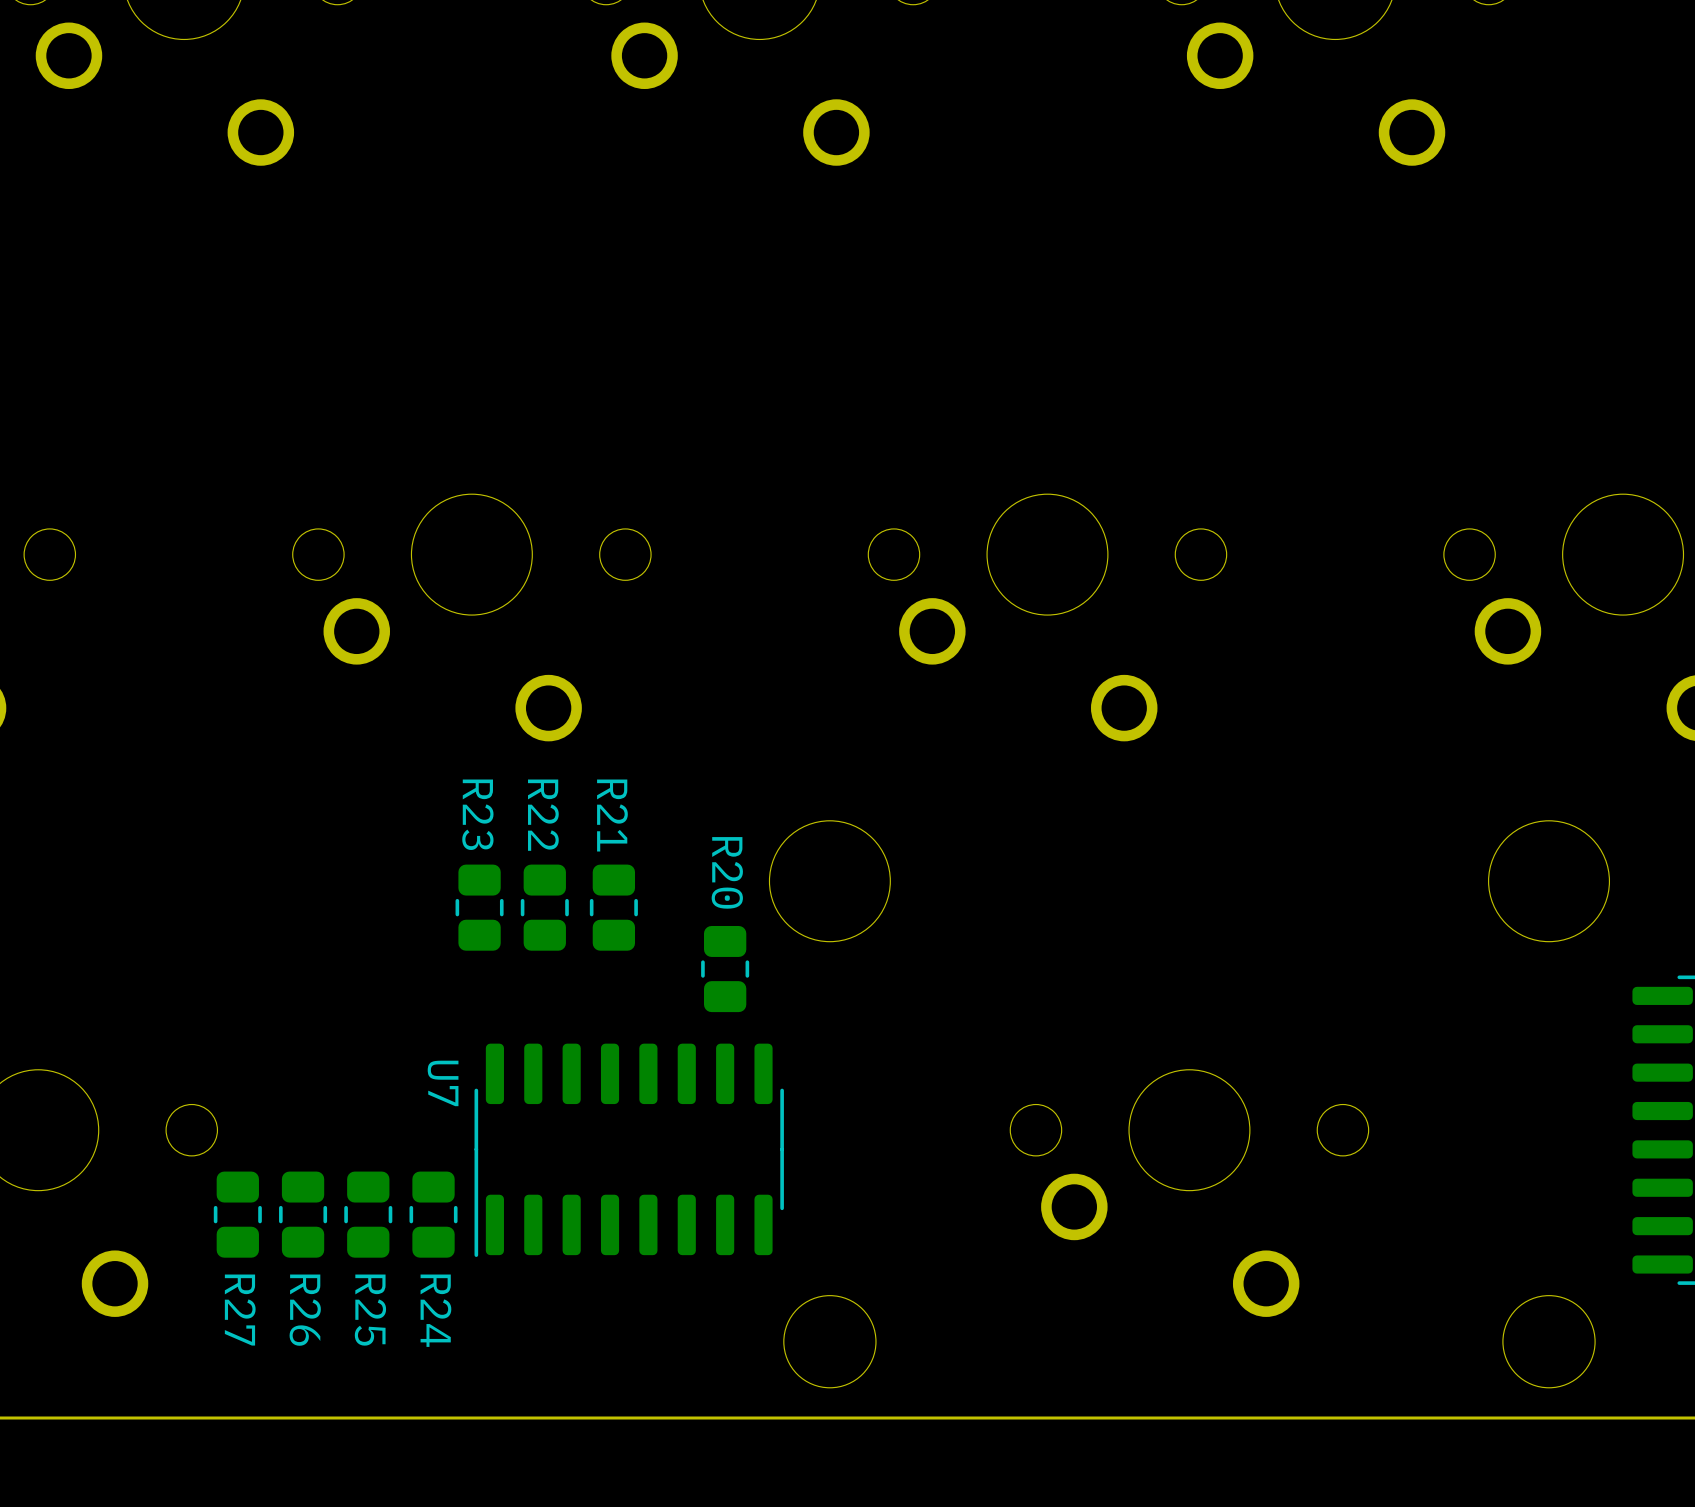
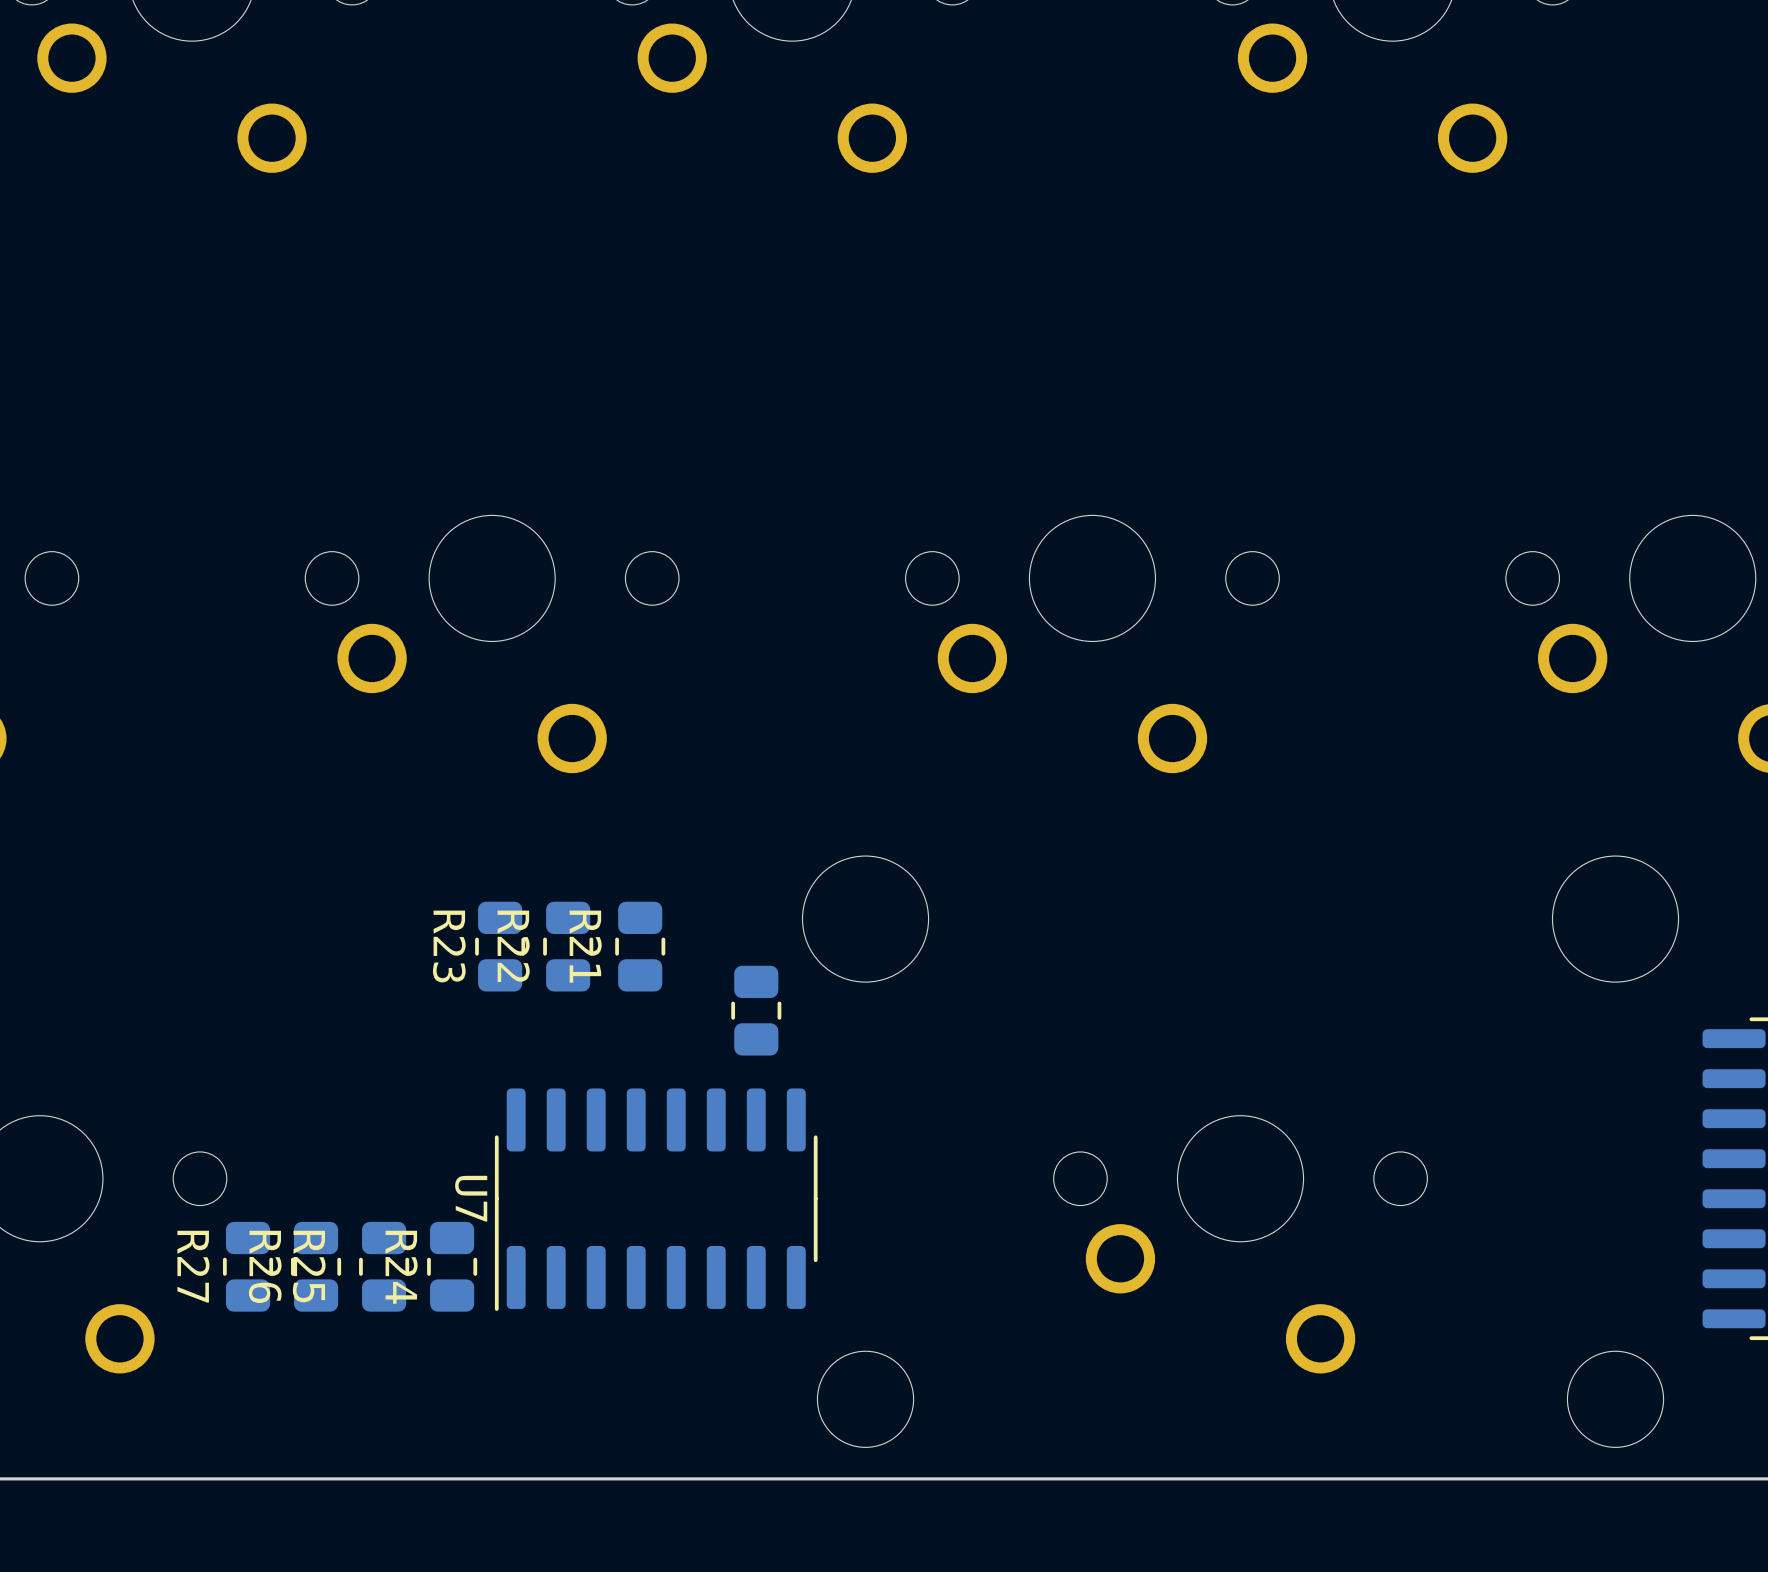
R23 name position: R23 (477, 814) -> R23 (449, 946)
R22 name position: R22 (543, 815) -> R22 (513, 946)
R21 name position: R21 (612, 815) -> R21 (585, 946)
R20 name: R20 (727, 872) -> none
U7 name position: U7 (443, 1083) -> U7 (471, 1198)
R27 name position: R27 (240, 1310) -> R27 (193, 1266)
R26 name position: R26 (305, 1310) -> R26 (265, 1266)
R25 name position: R25 (370, 1310) -> R25 (309, 1266)
R24 name position: R24 (435, 1310) -> R24 (401, 1267)

